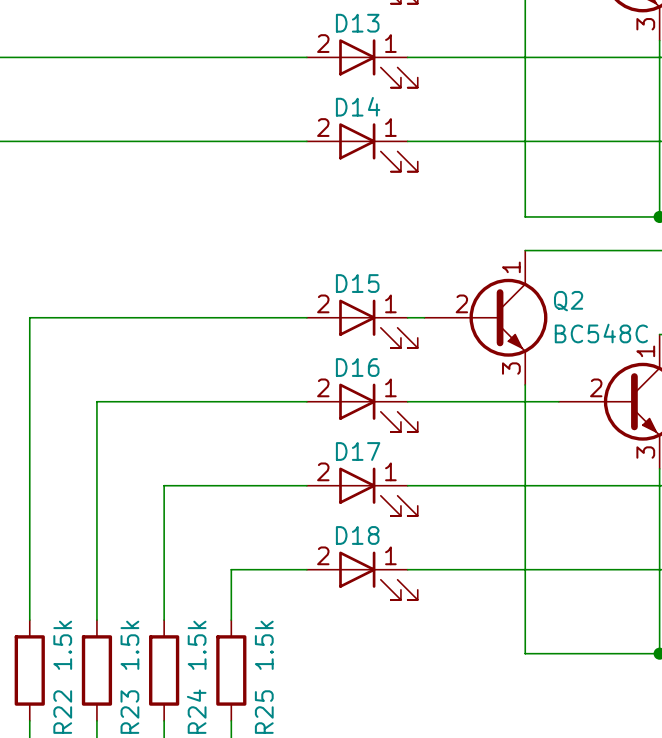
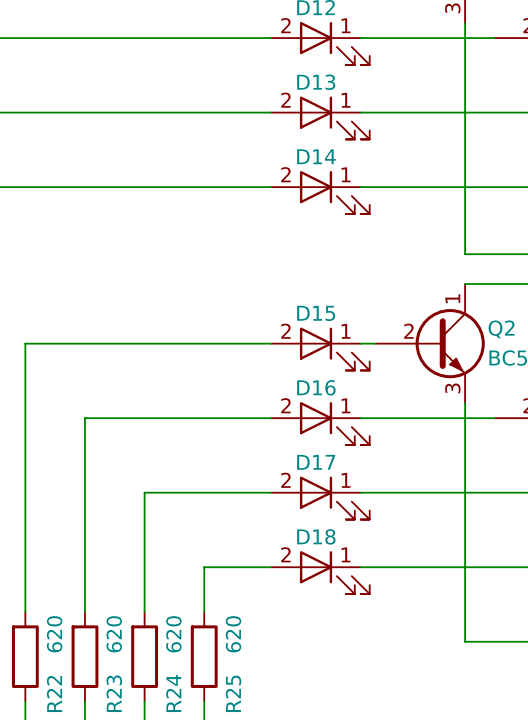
R22 value: 1.5k (62, 645) -> 620 (54, 634)
R23 value: 1.5k (129, 645) -> 620 (114, 634)
R24 value: 1.5k (197, 645) -> 620 (173, 634)
R25 value: 1.5k (264, 645) -> 620 (233, 634)

